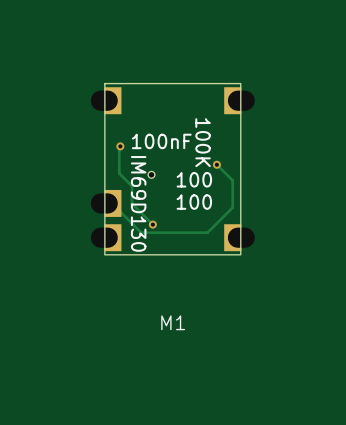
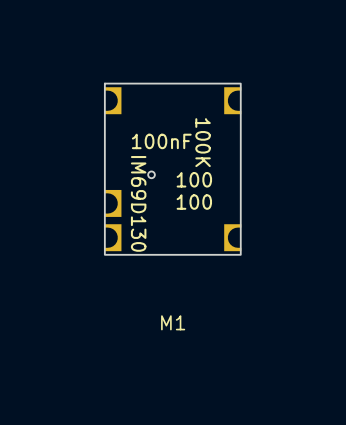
track: (120, 146) (119, 173) (132, 186) (132, 203) (152, 224) -> none
via: (120, 146) -> none
track: (216, 164) (232, 180) (232, 207) (207, 232) (141, 232) (112, 203) (104, 203) -> none
via: (216, 164) -> none
via: (152, 224) -> none

